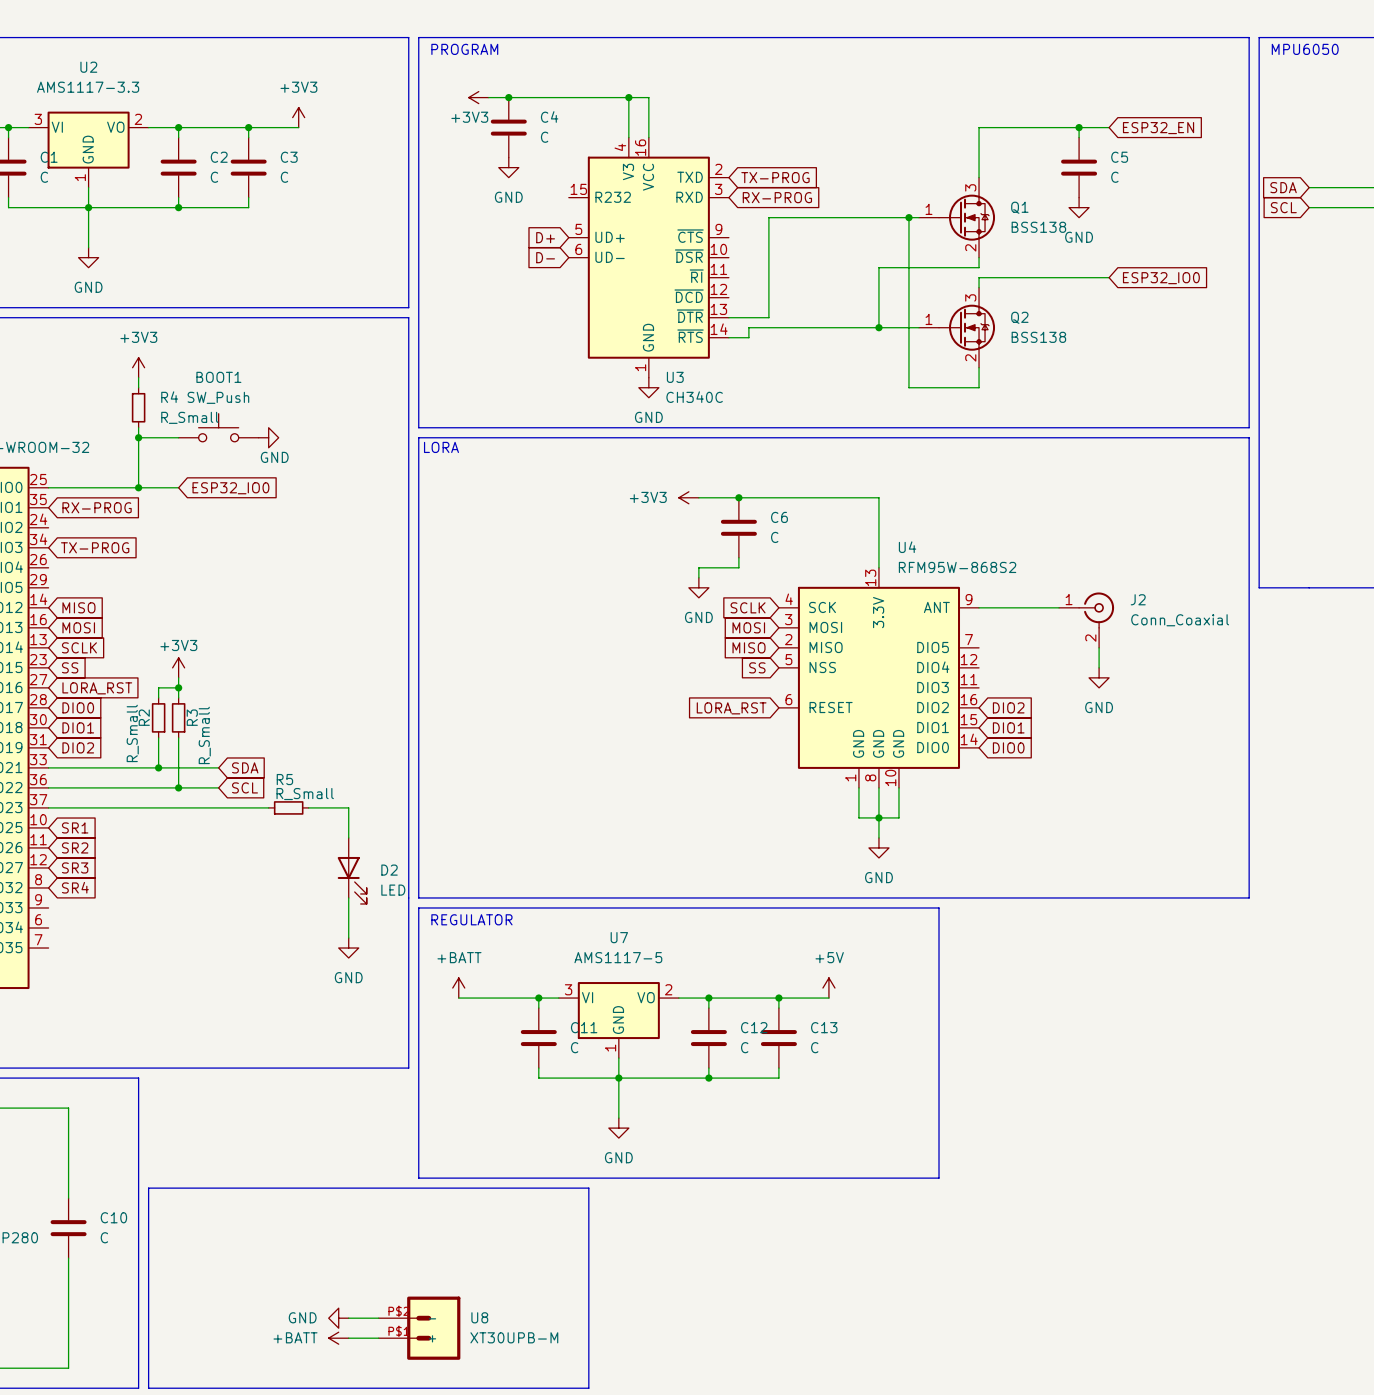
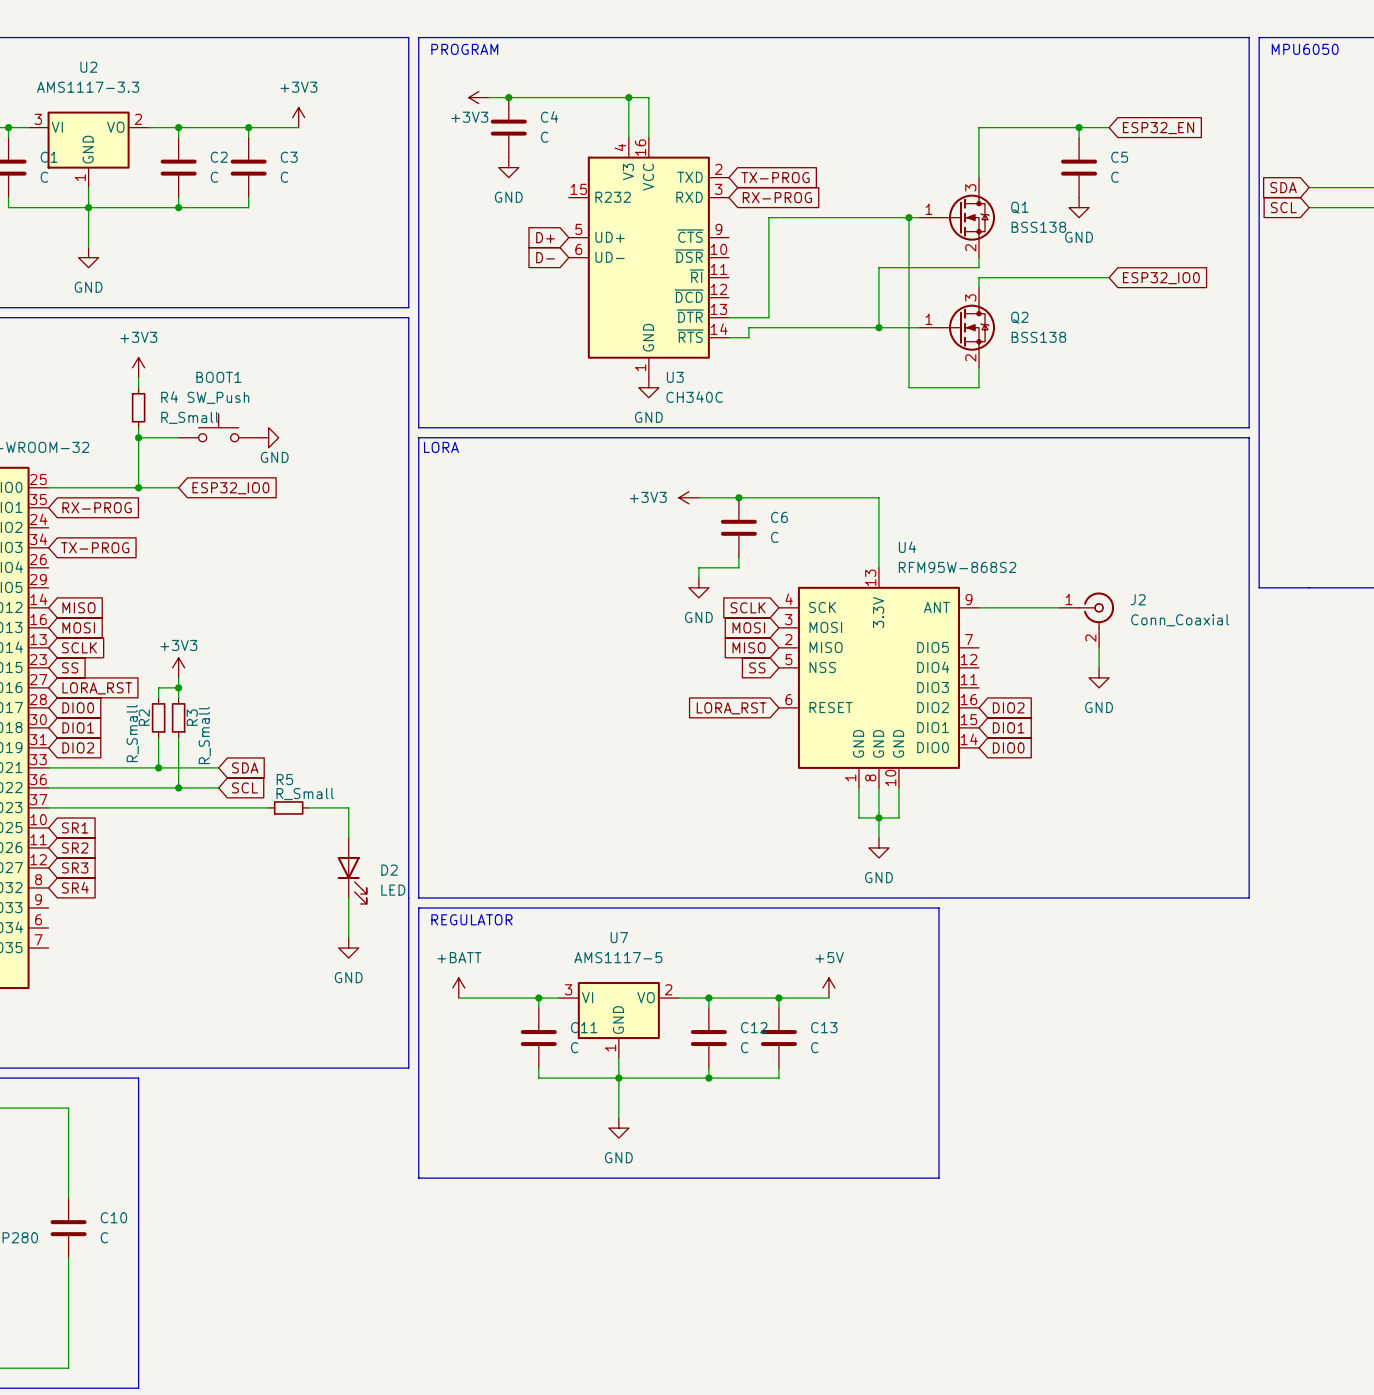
line: (148, 1188) (588, 1188) (588, 1388) (148, 1388) (148, 1188) -> none
power symbol: GND (338, 1318) -> none
wire: (348, 1318) (378, 1318) -> none
U8: XT30UPB-M (419, 1328) -> none
power symbol: +BATT (338, 1338) -> none
wire: (348, 1338) (378, 1338) -> none

